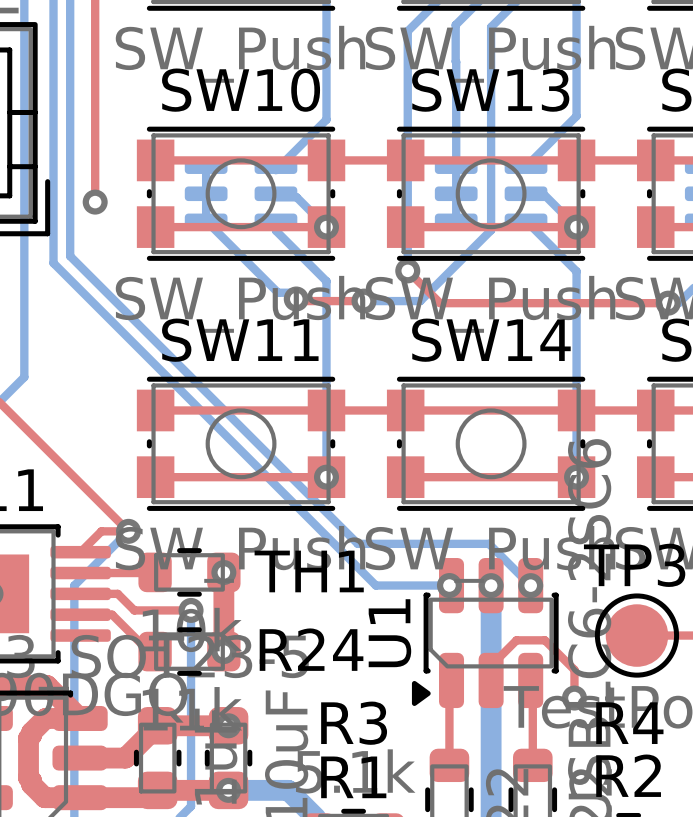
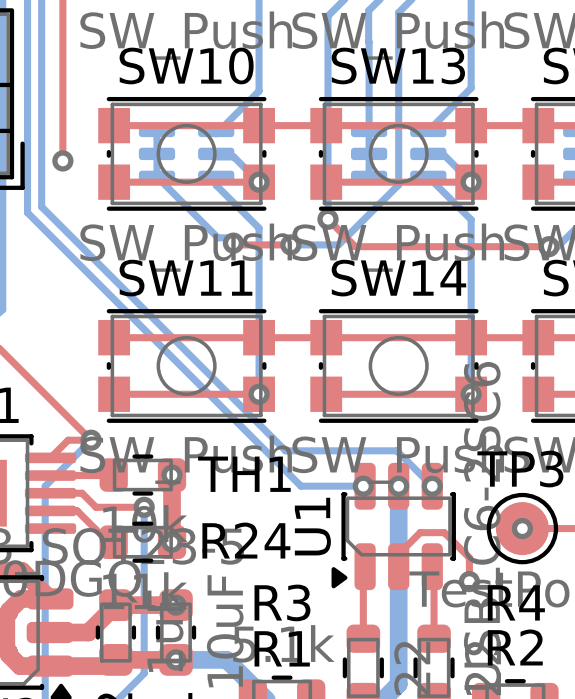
via: none -> (522, 528)

